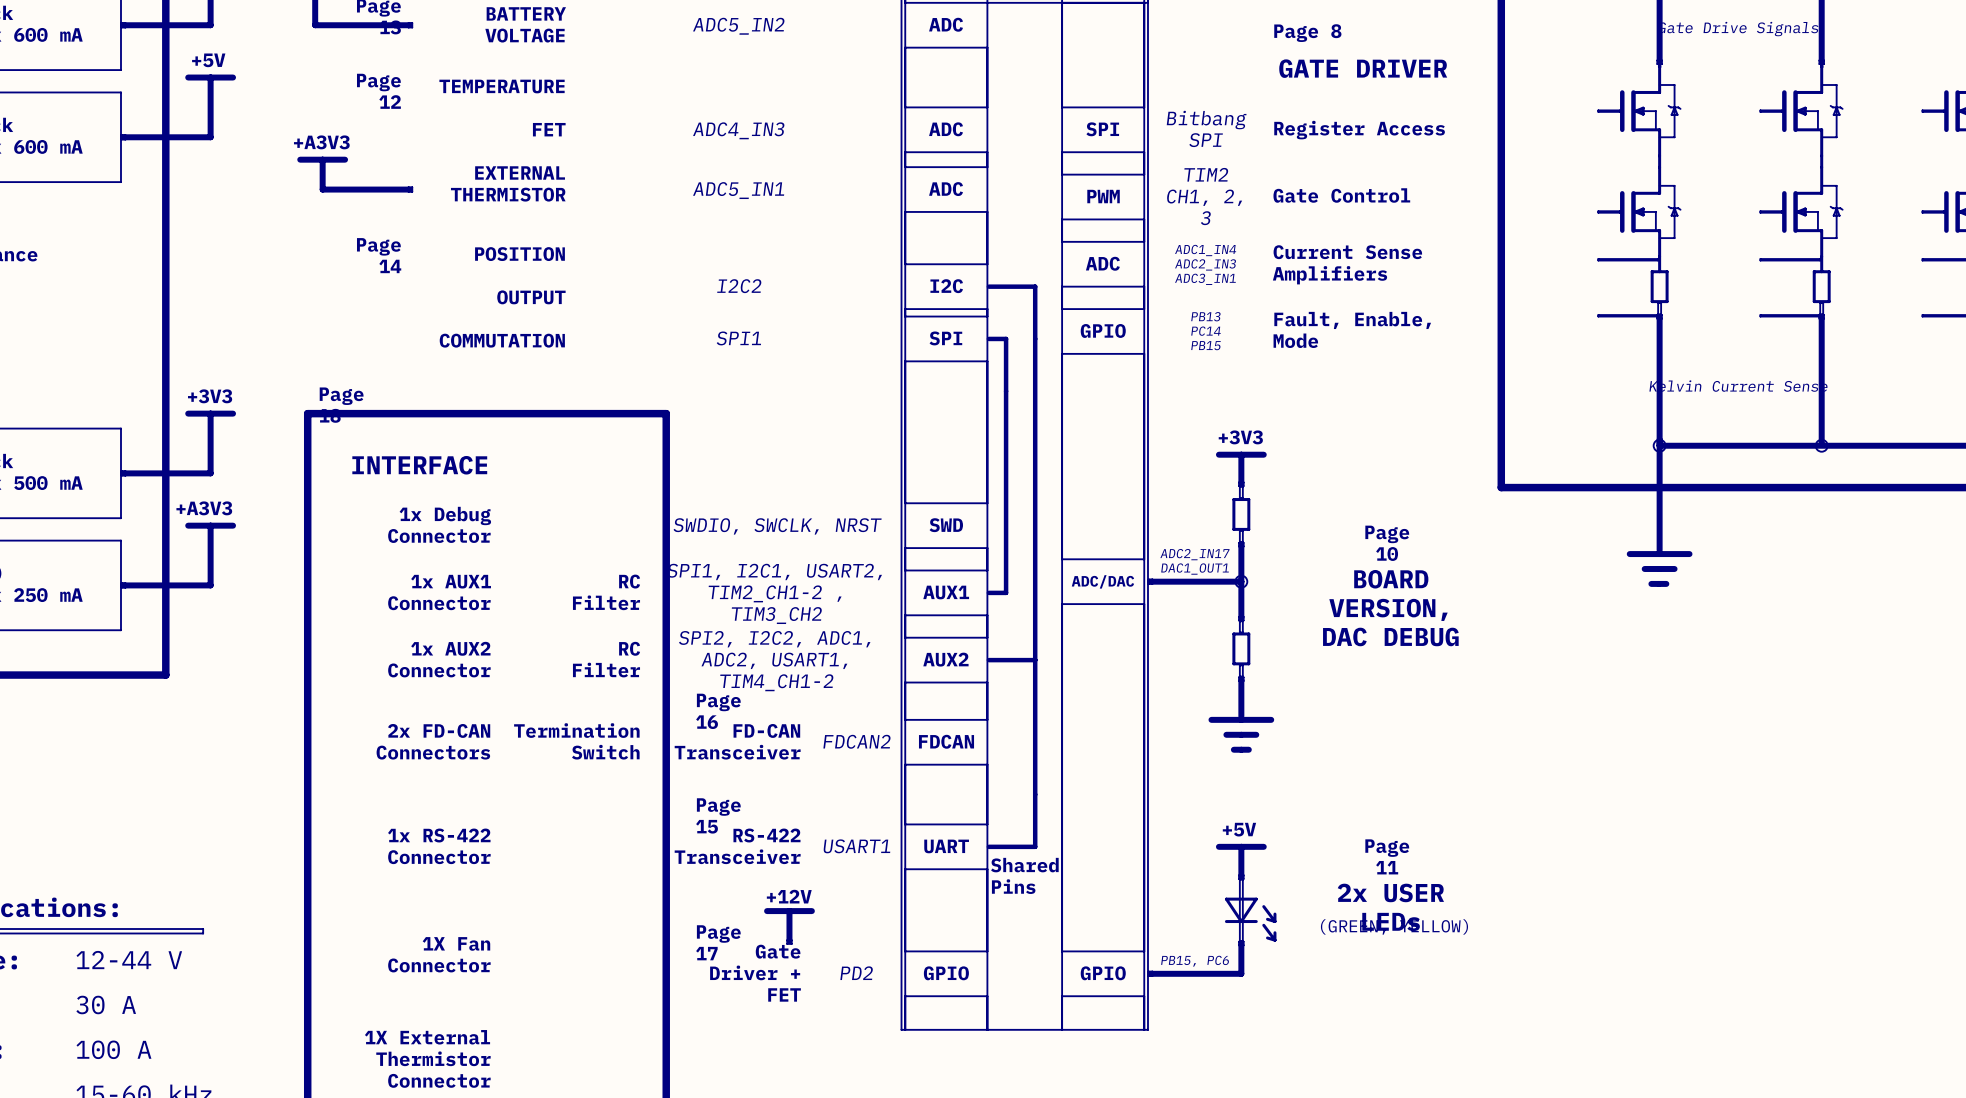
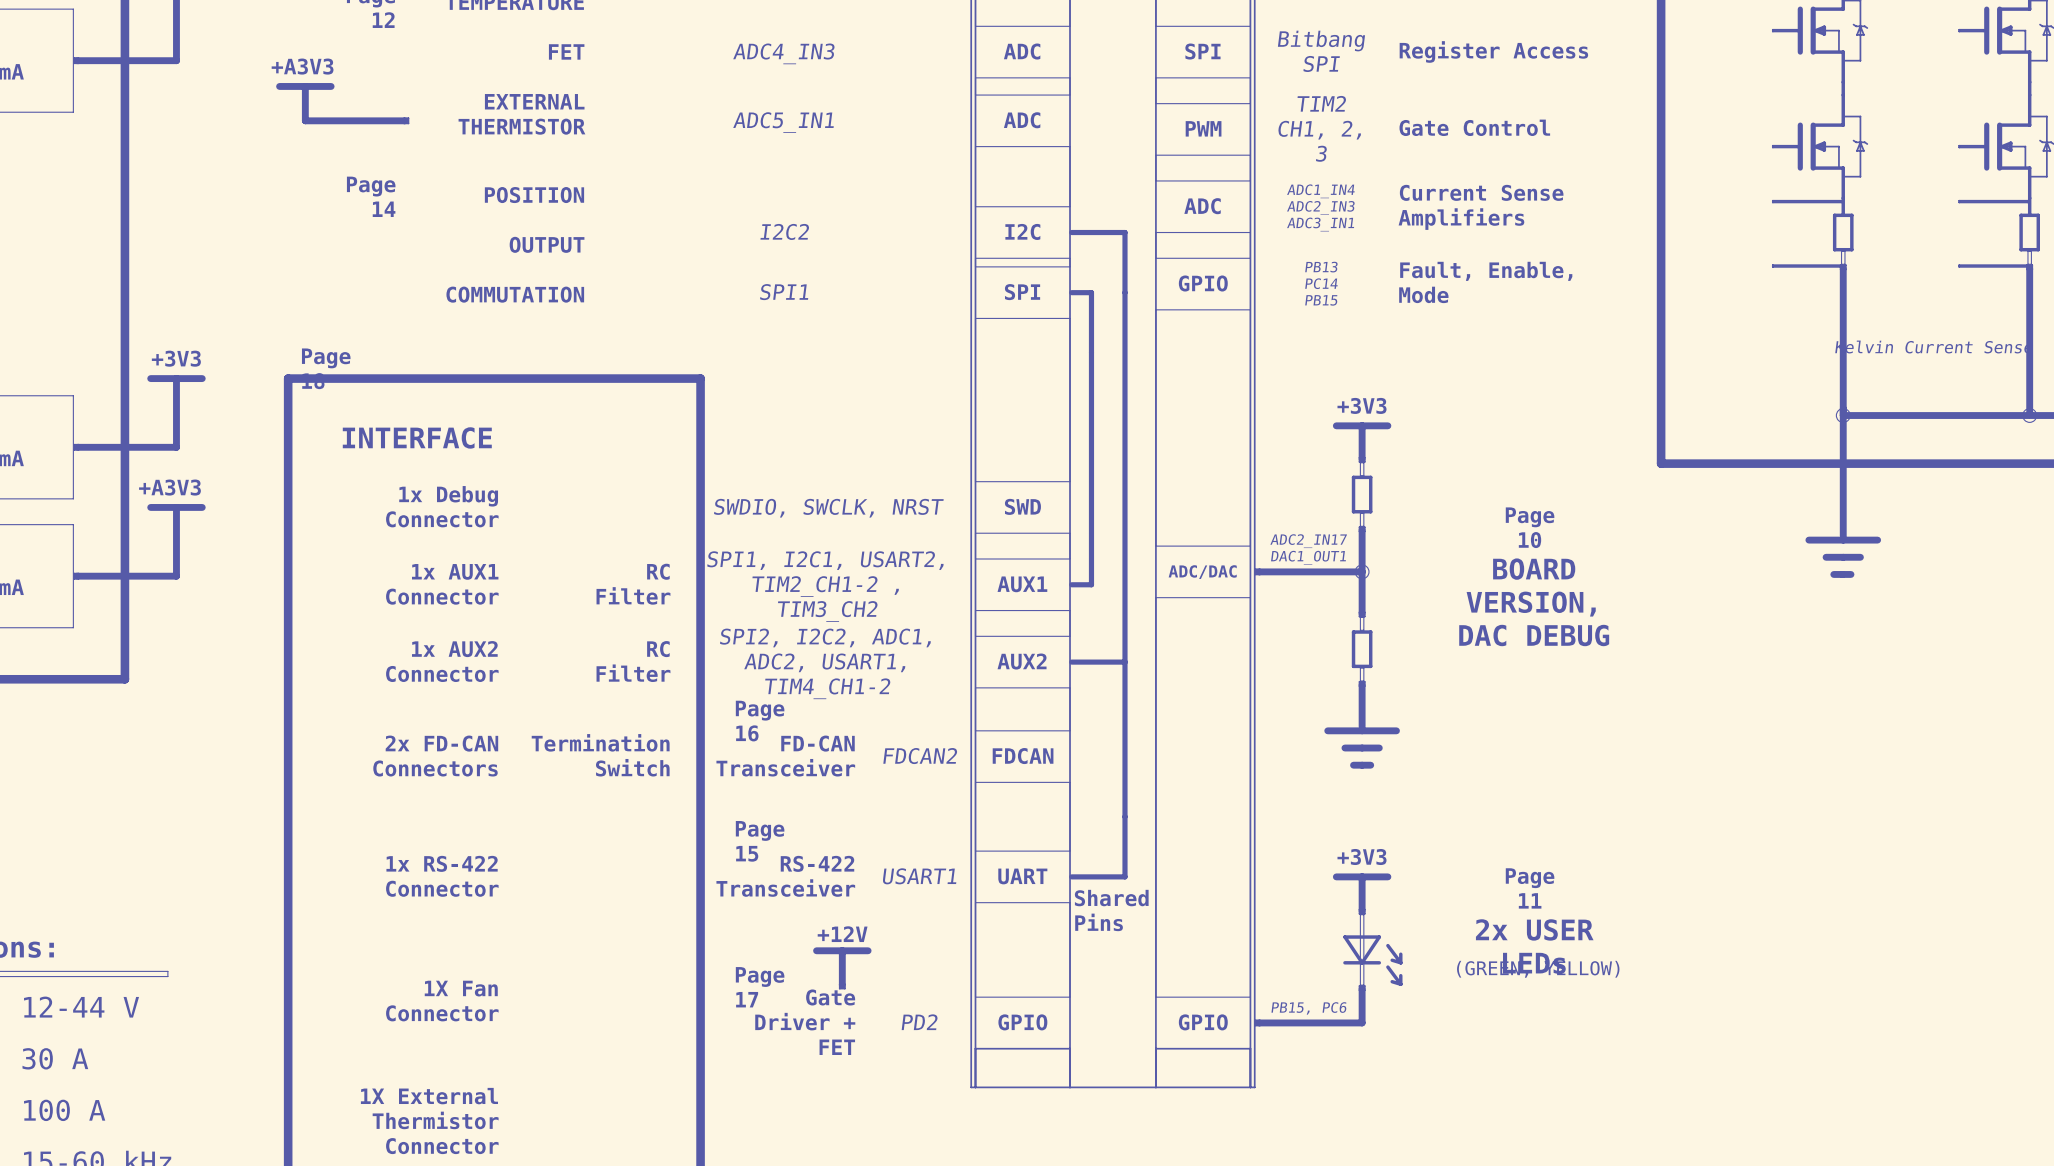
text: +5V (1239, 829) -> none
text: none -> +3V3 (1362, 856)

